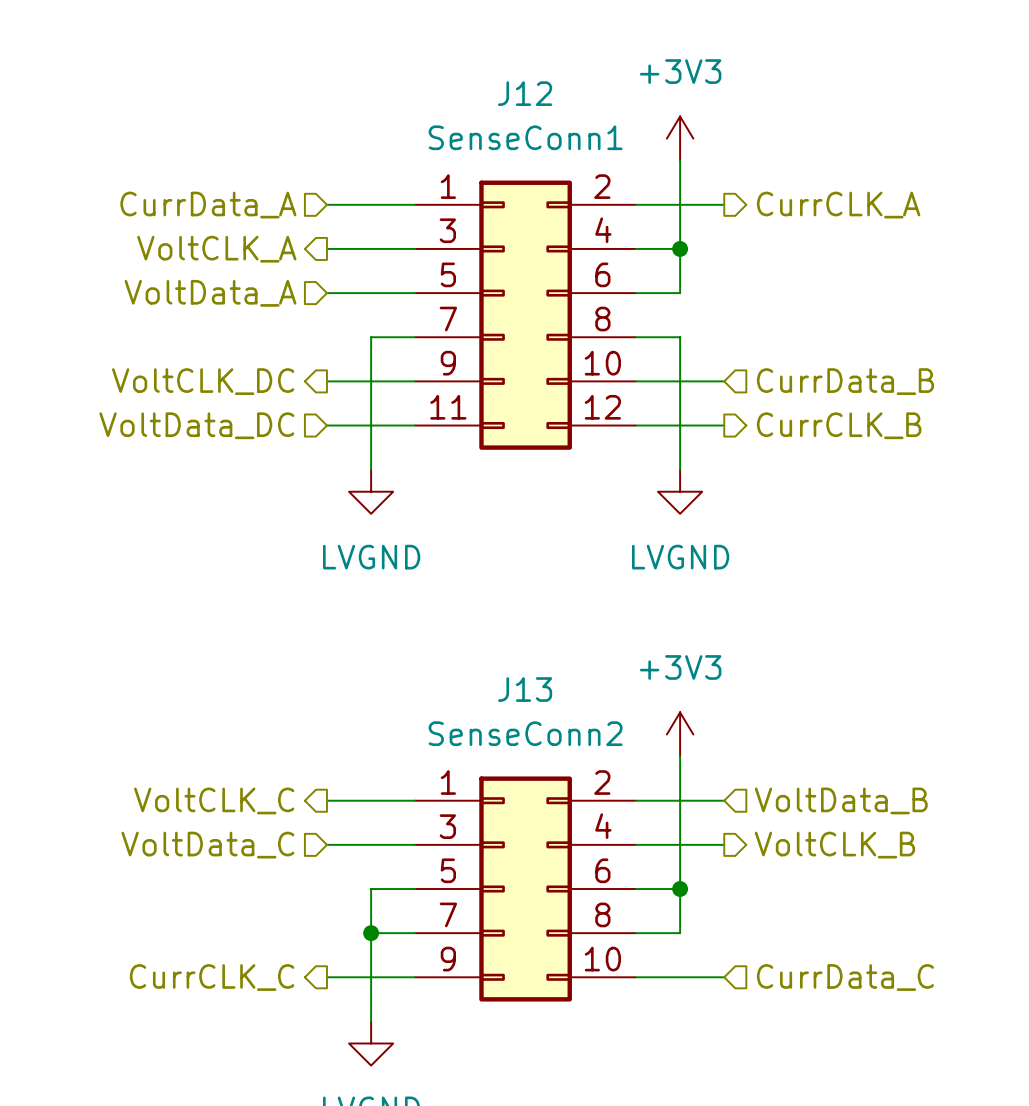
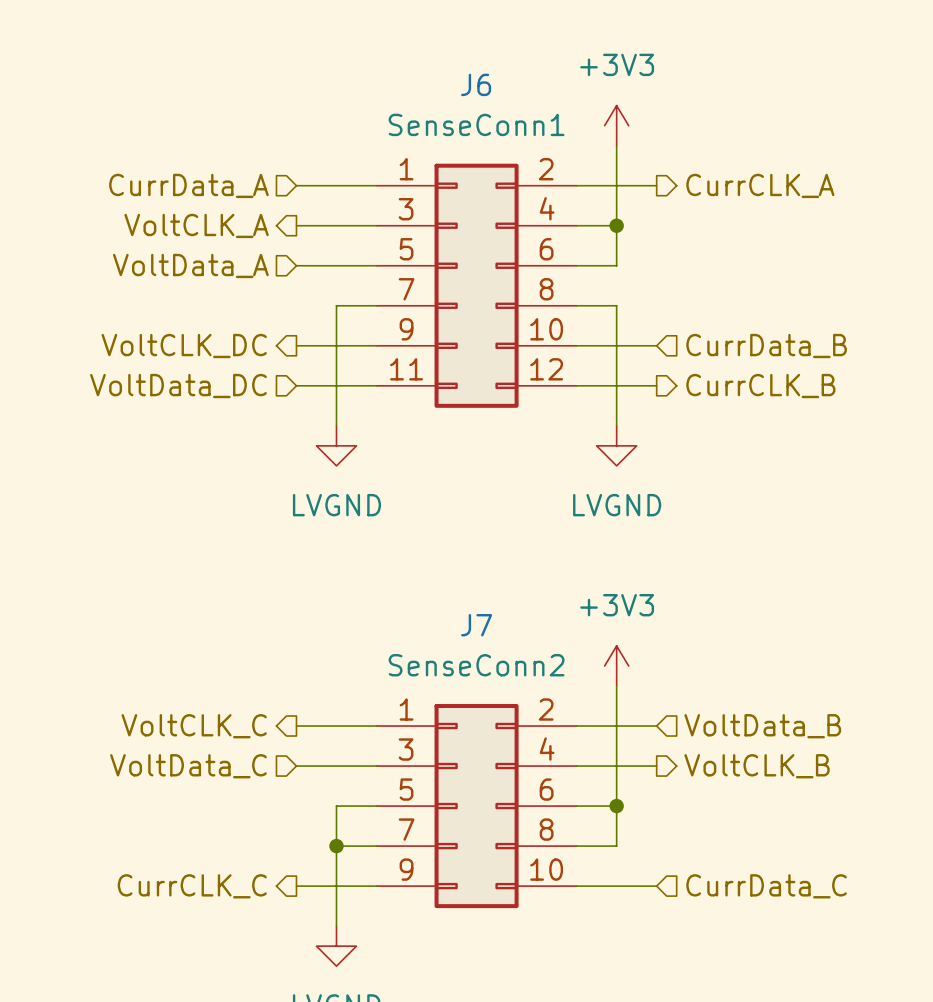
J12 name: J12 (525, 93) -> J6 (476, 84)
J13 name: J13 (525, 689) -> J7 (476, 625)

